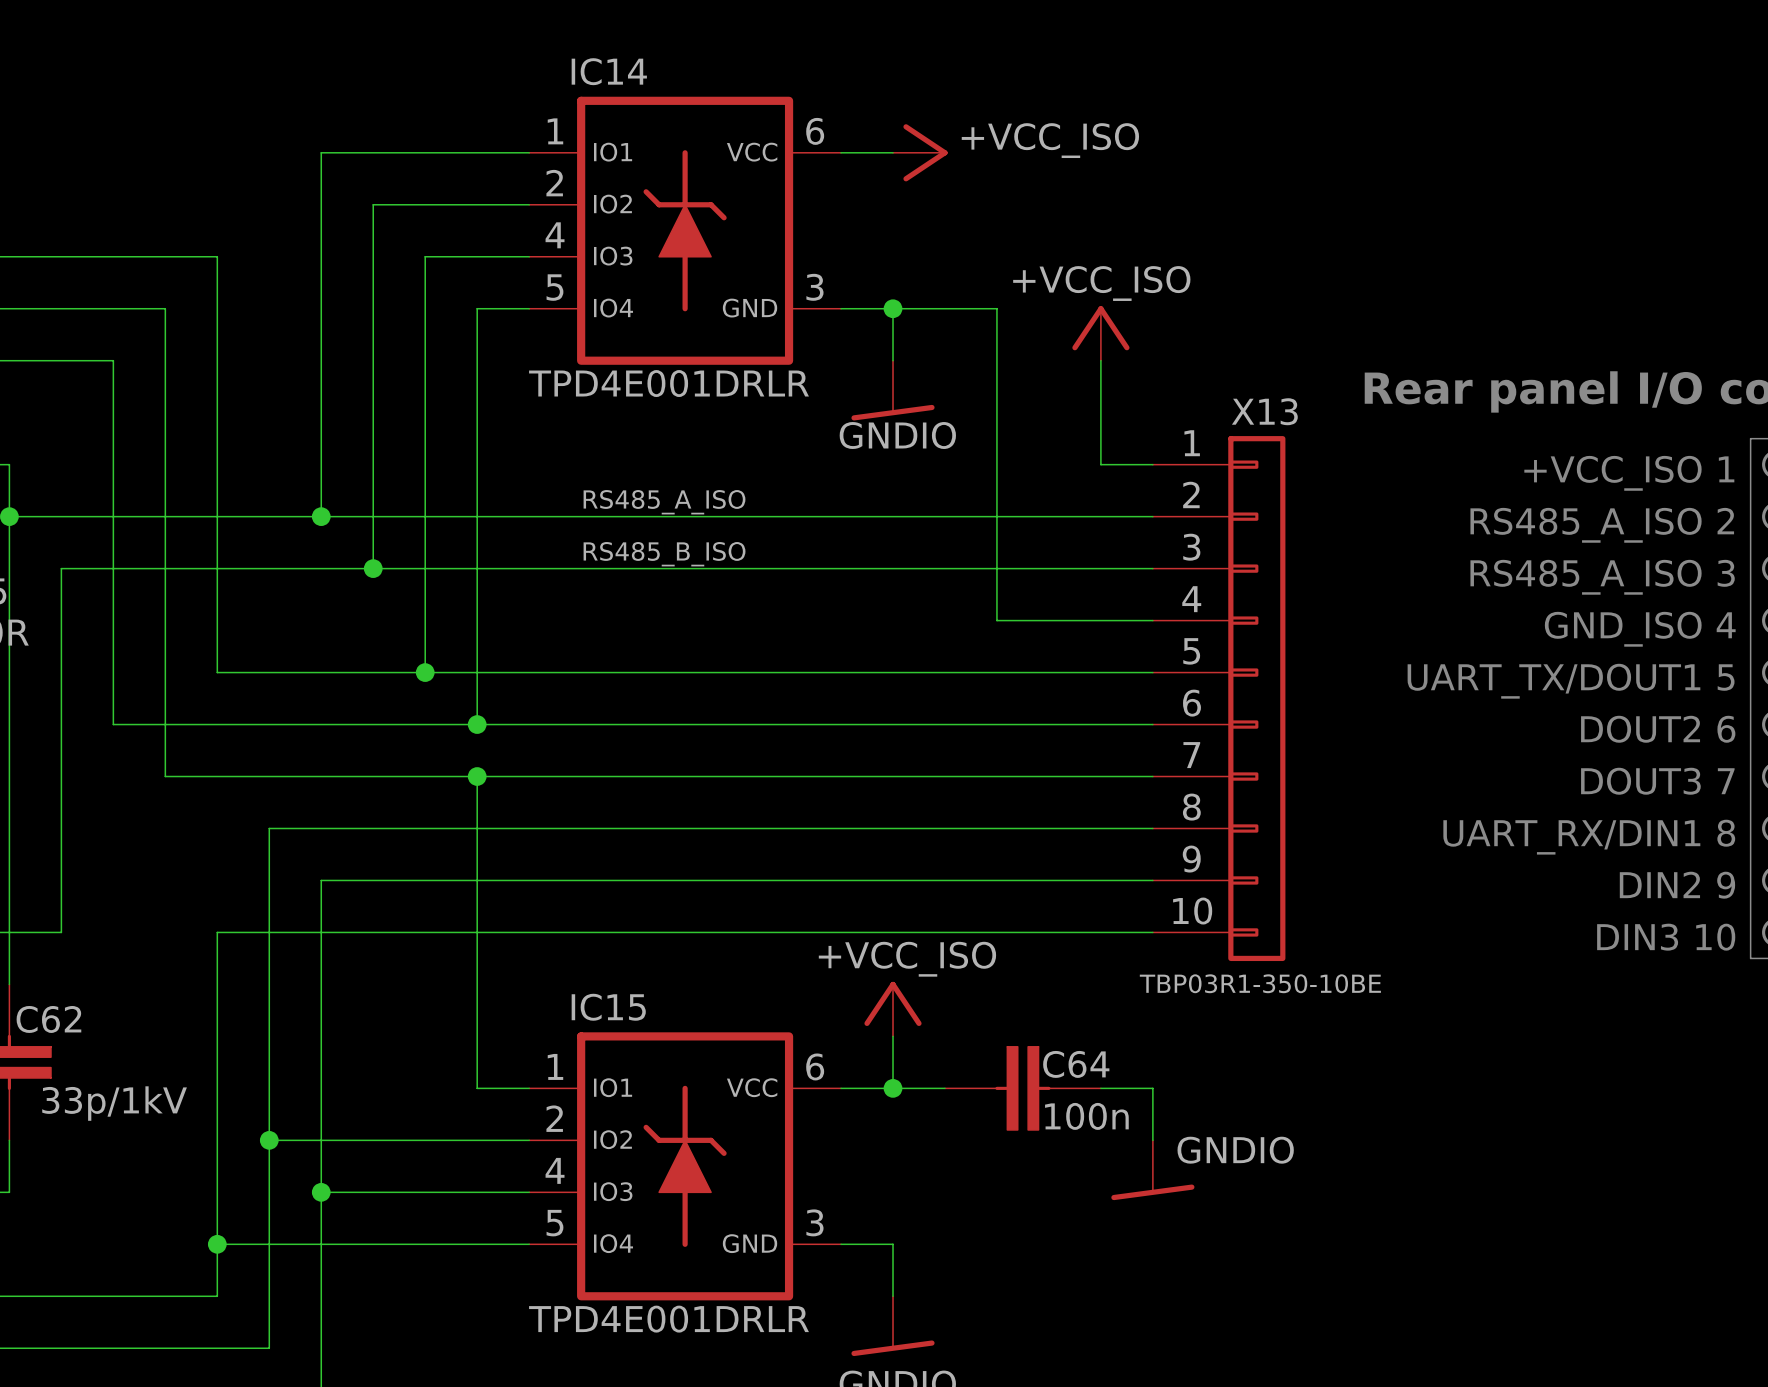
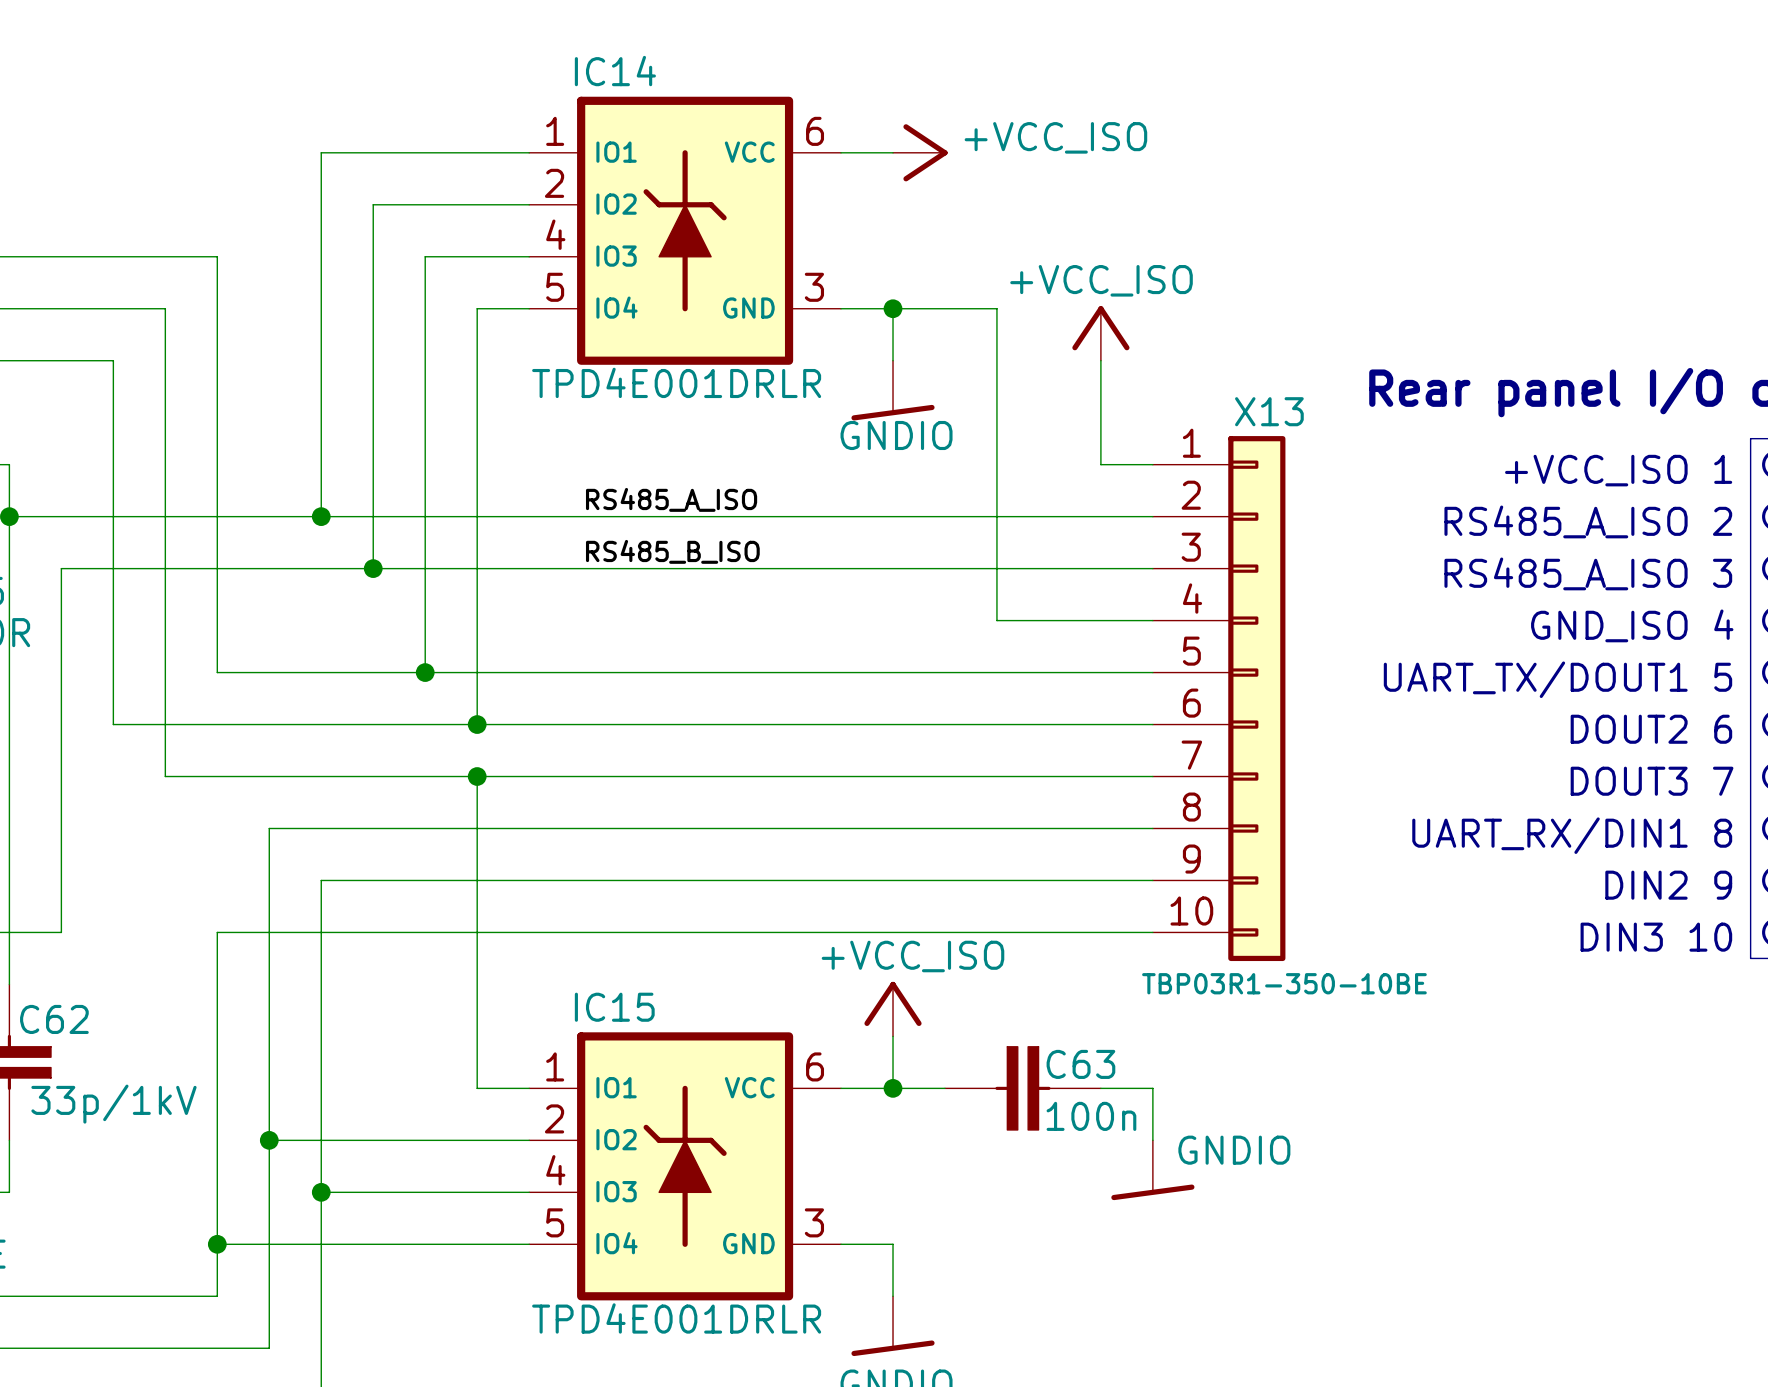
C64 name: C64 (1076, 1064) -> C63 (1080, 1064)

